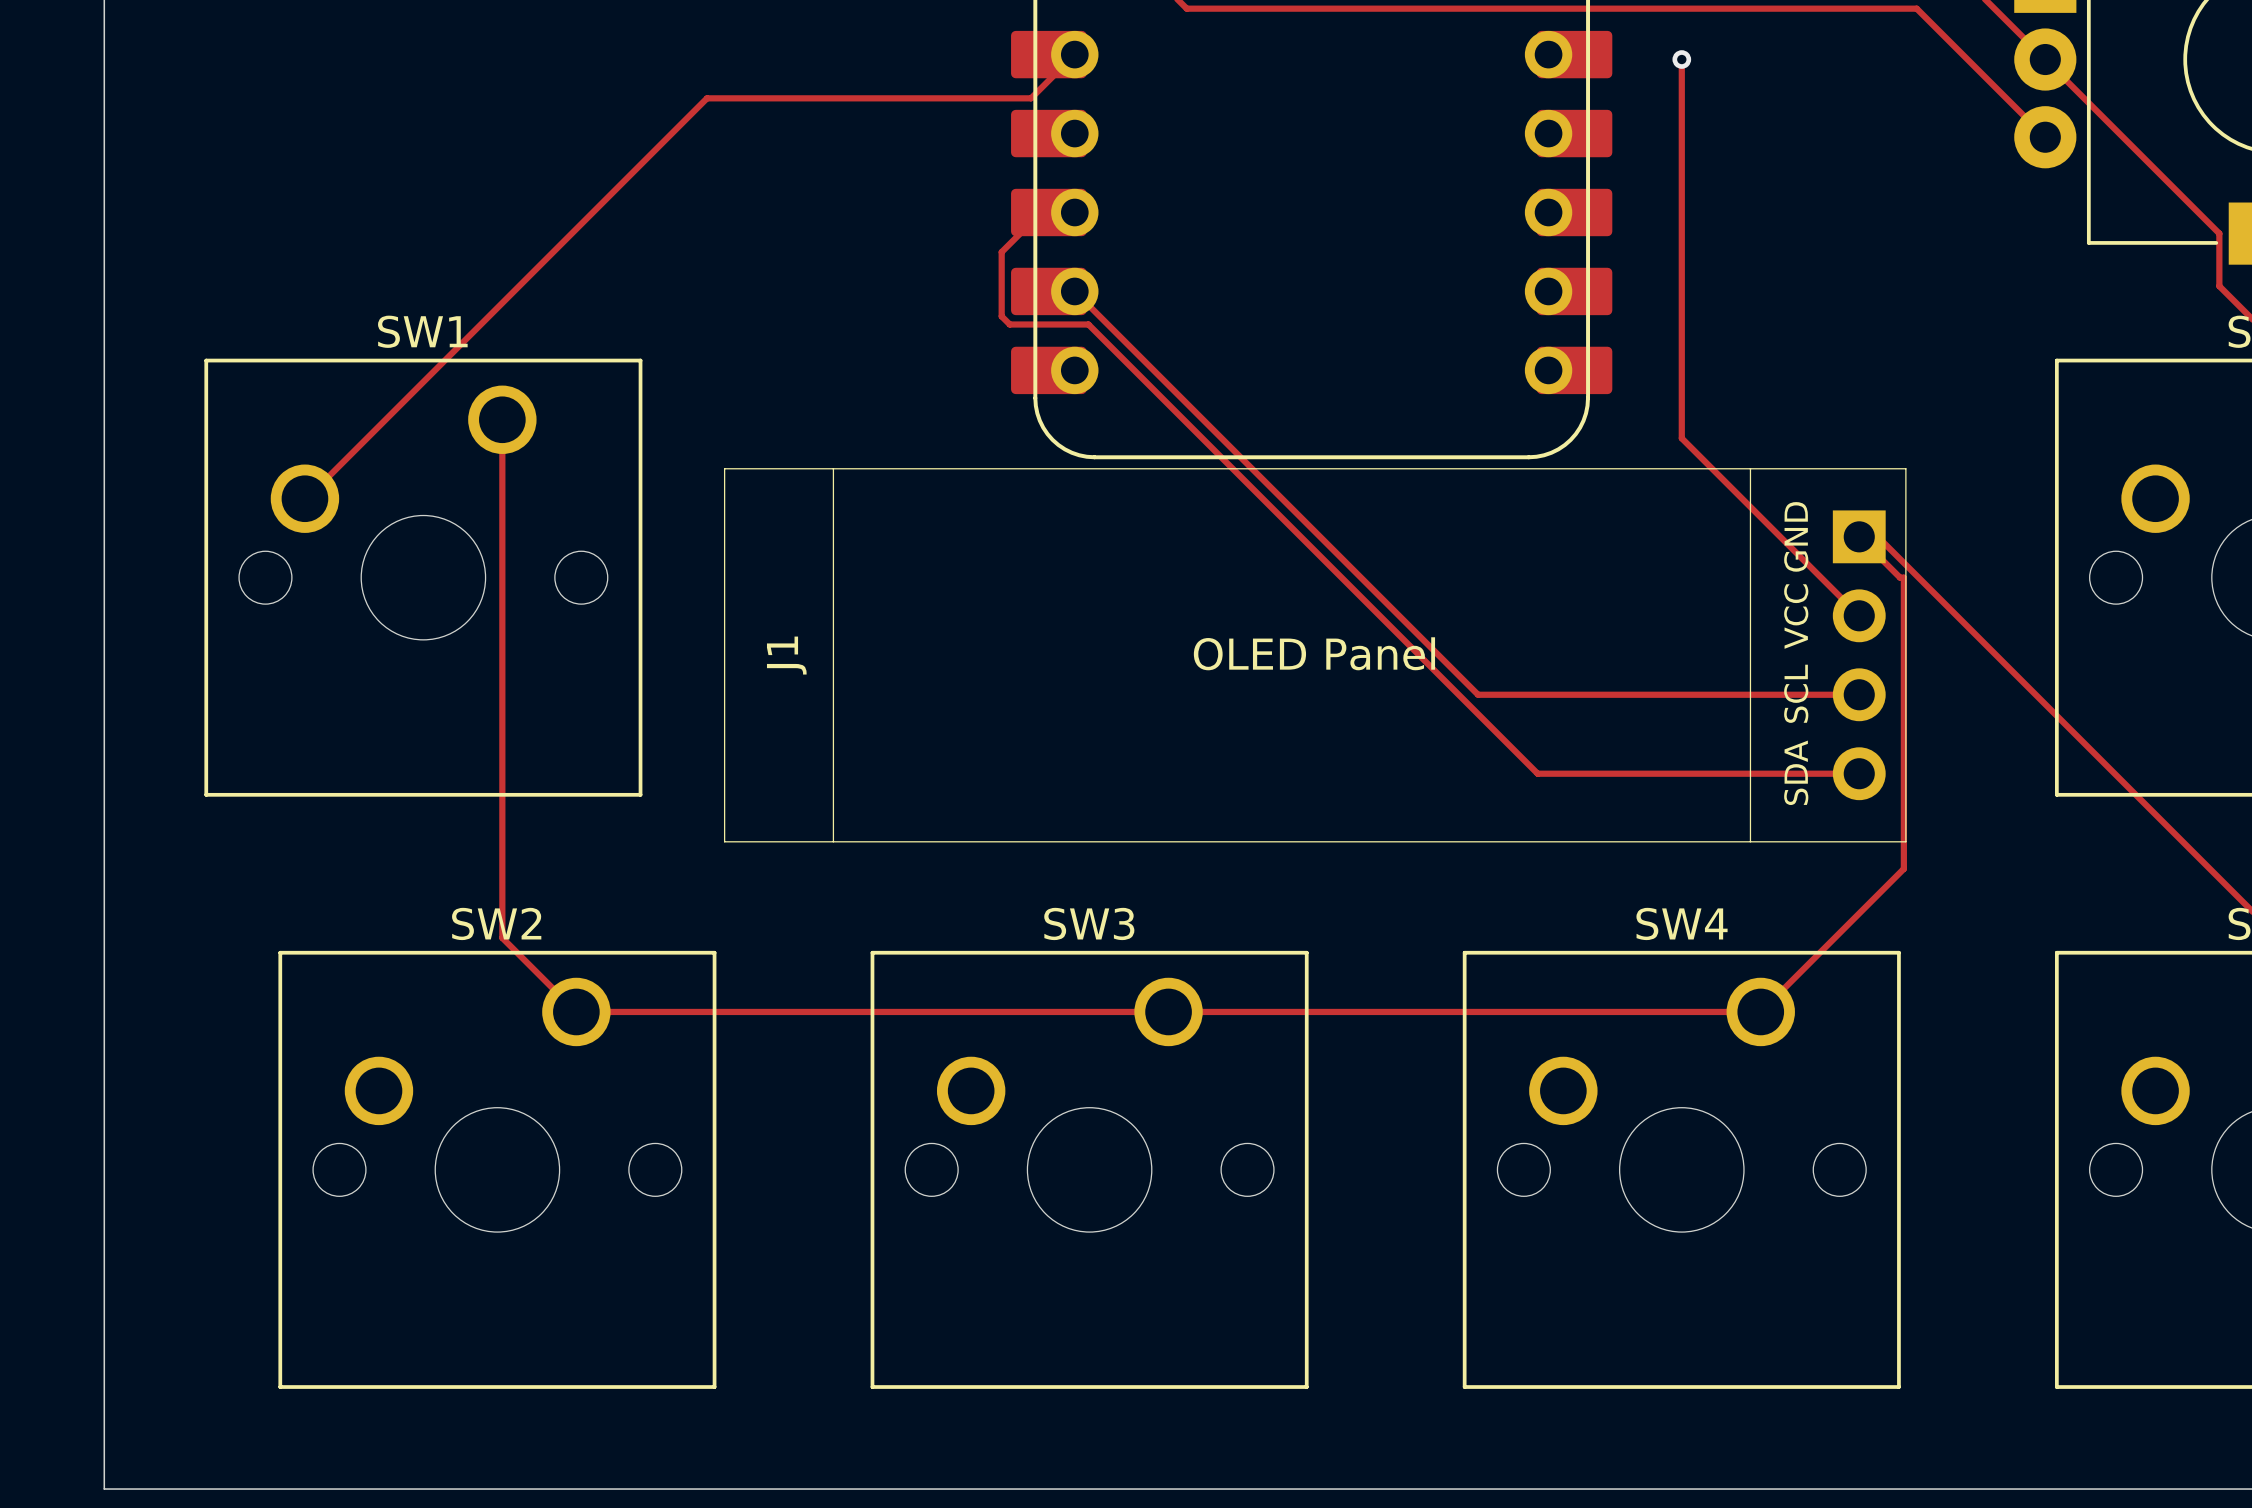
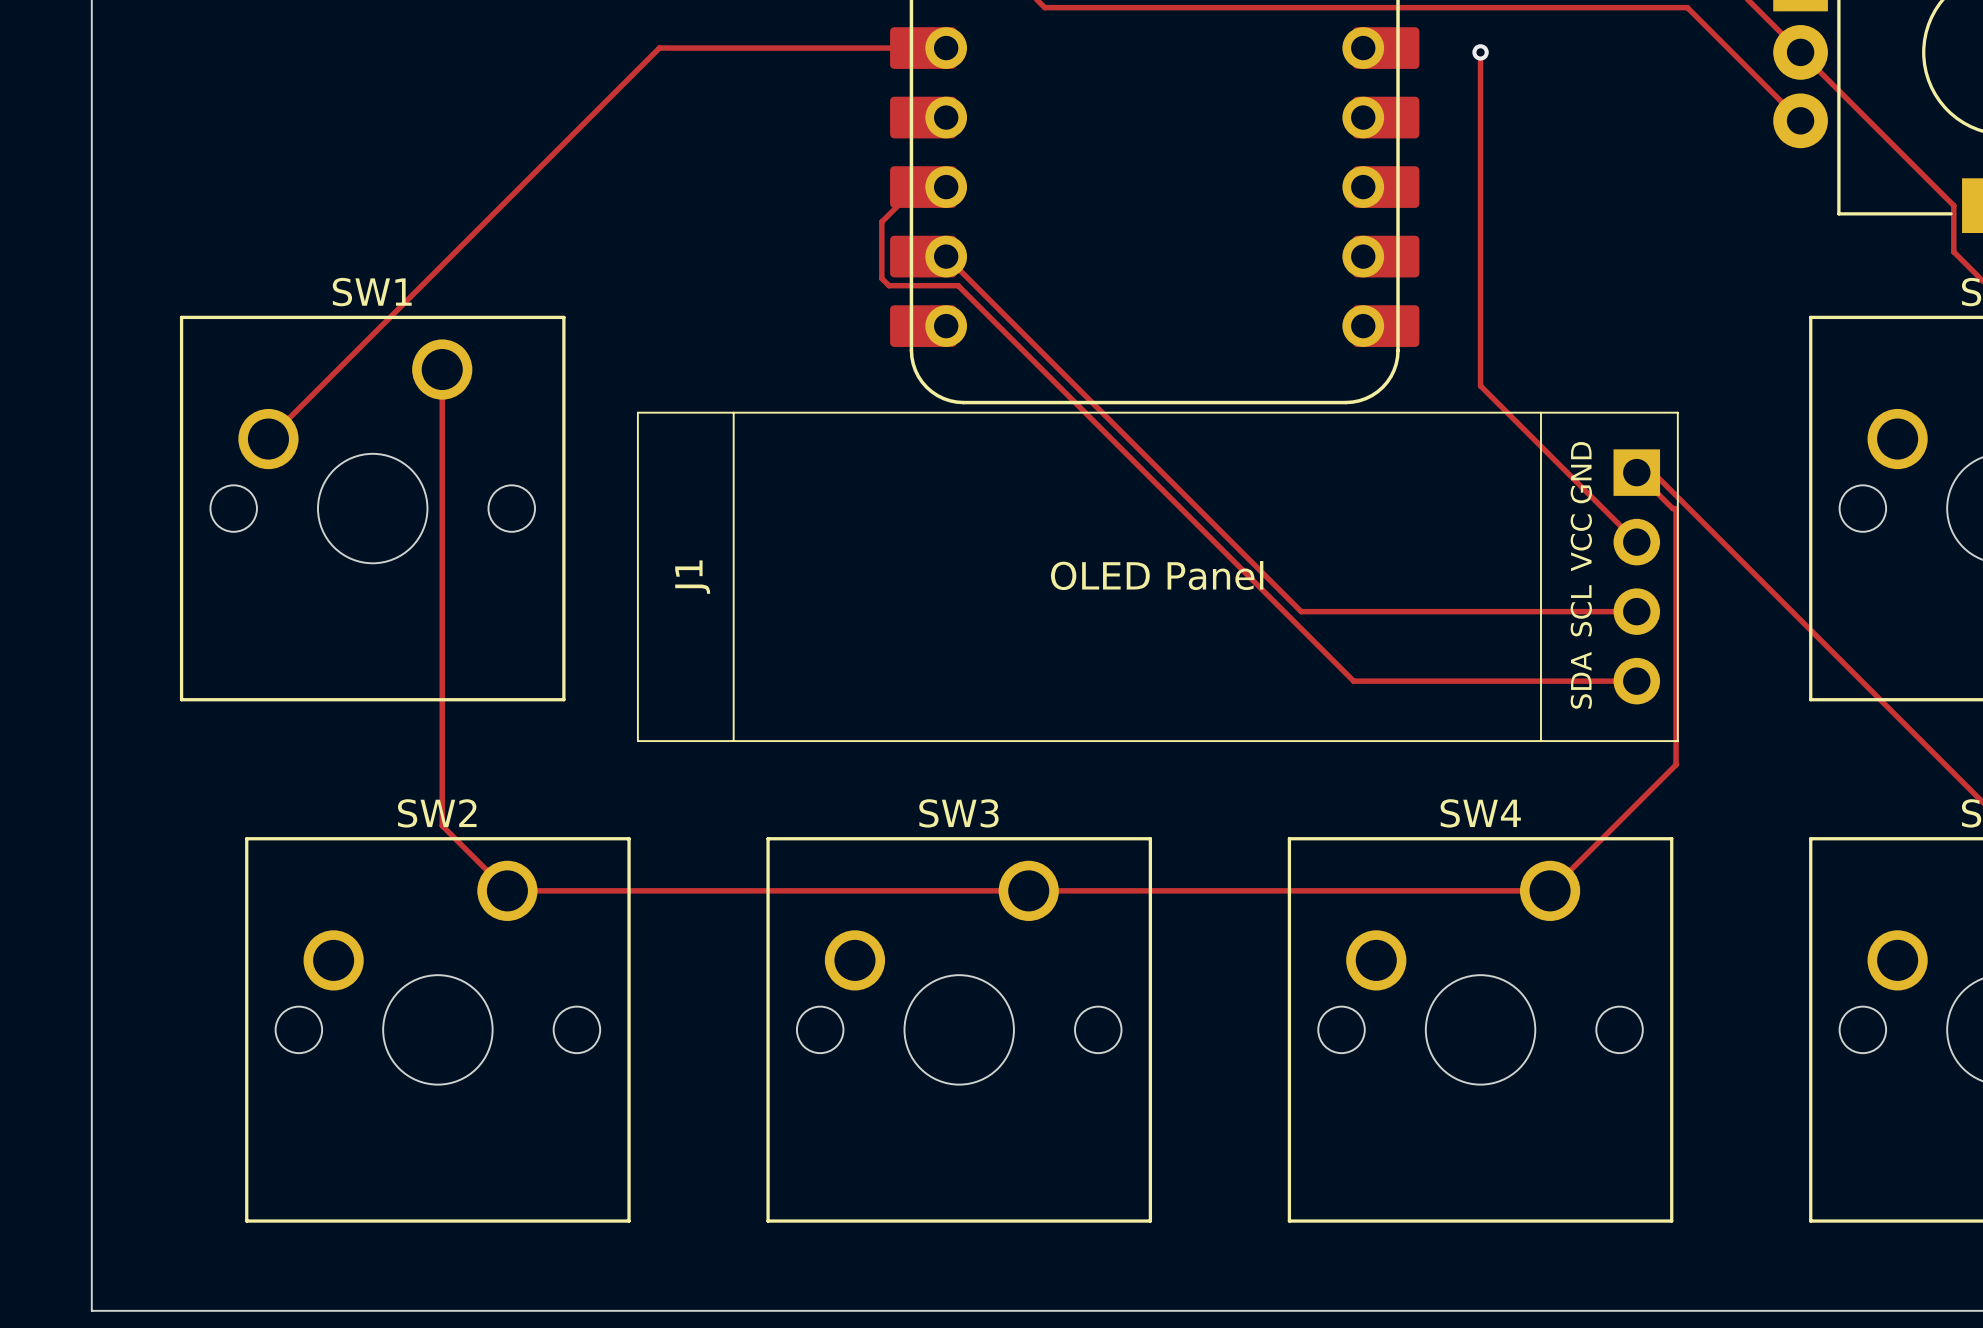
track: (1074, 54) (1031, 98) (707, 98) (304, 498) -> (946, 48) (659, 48) (268, 439)

